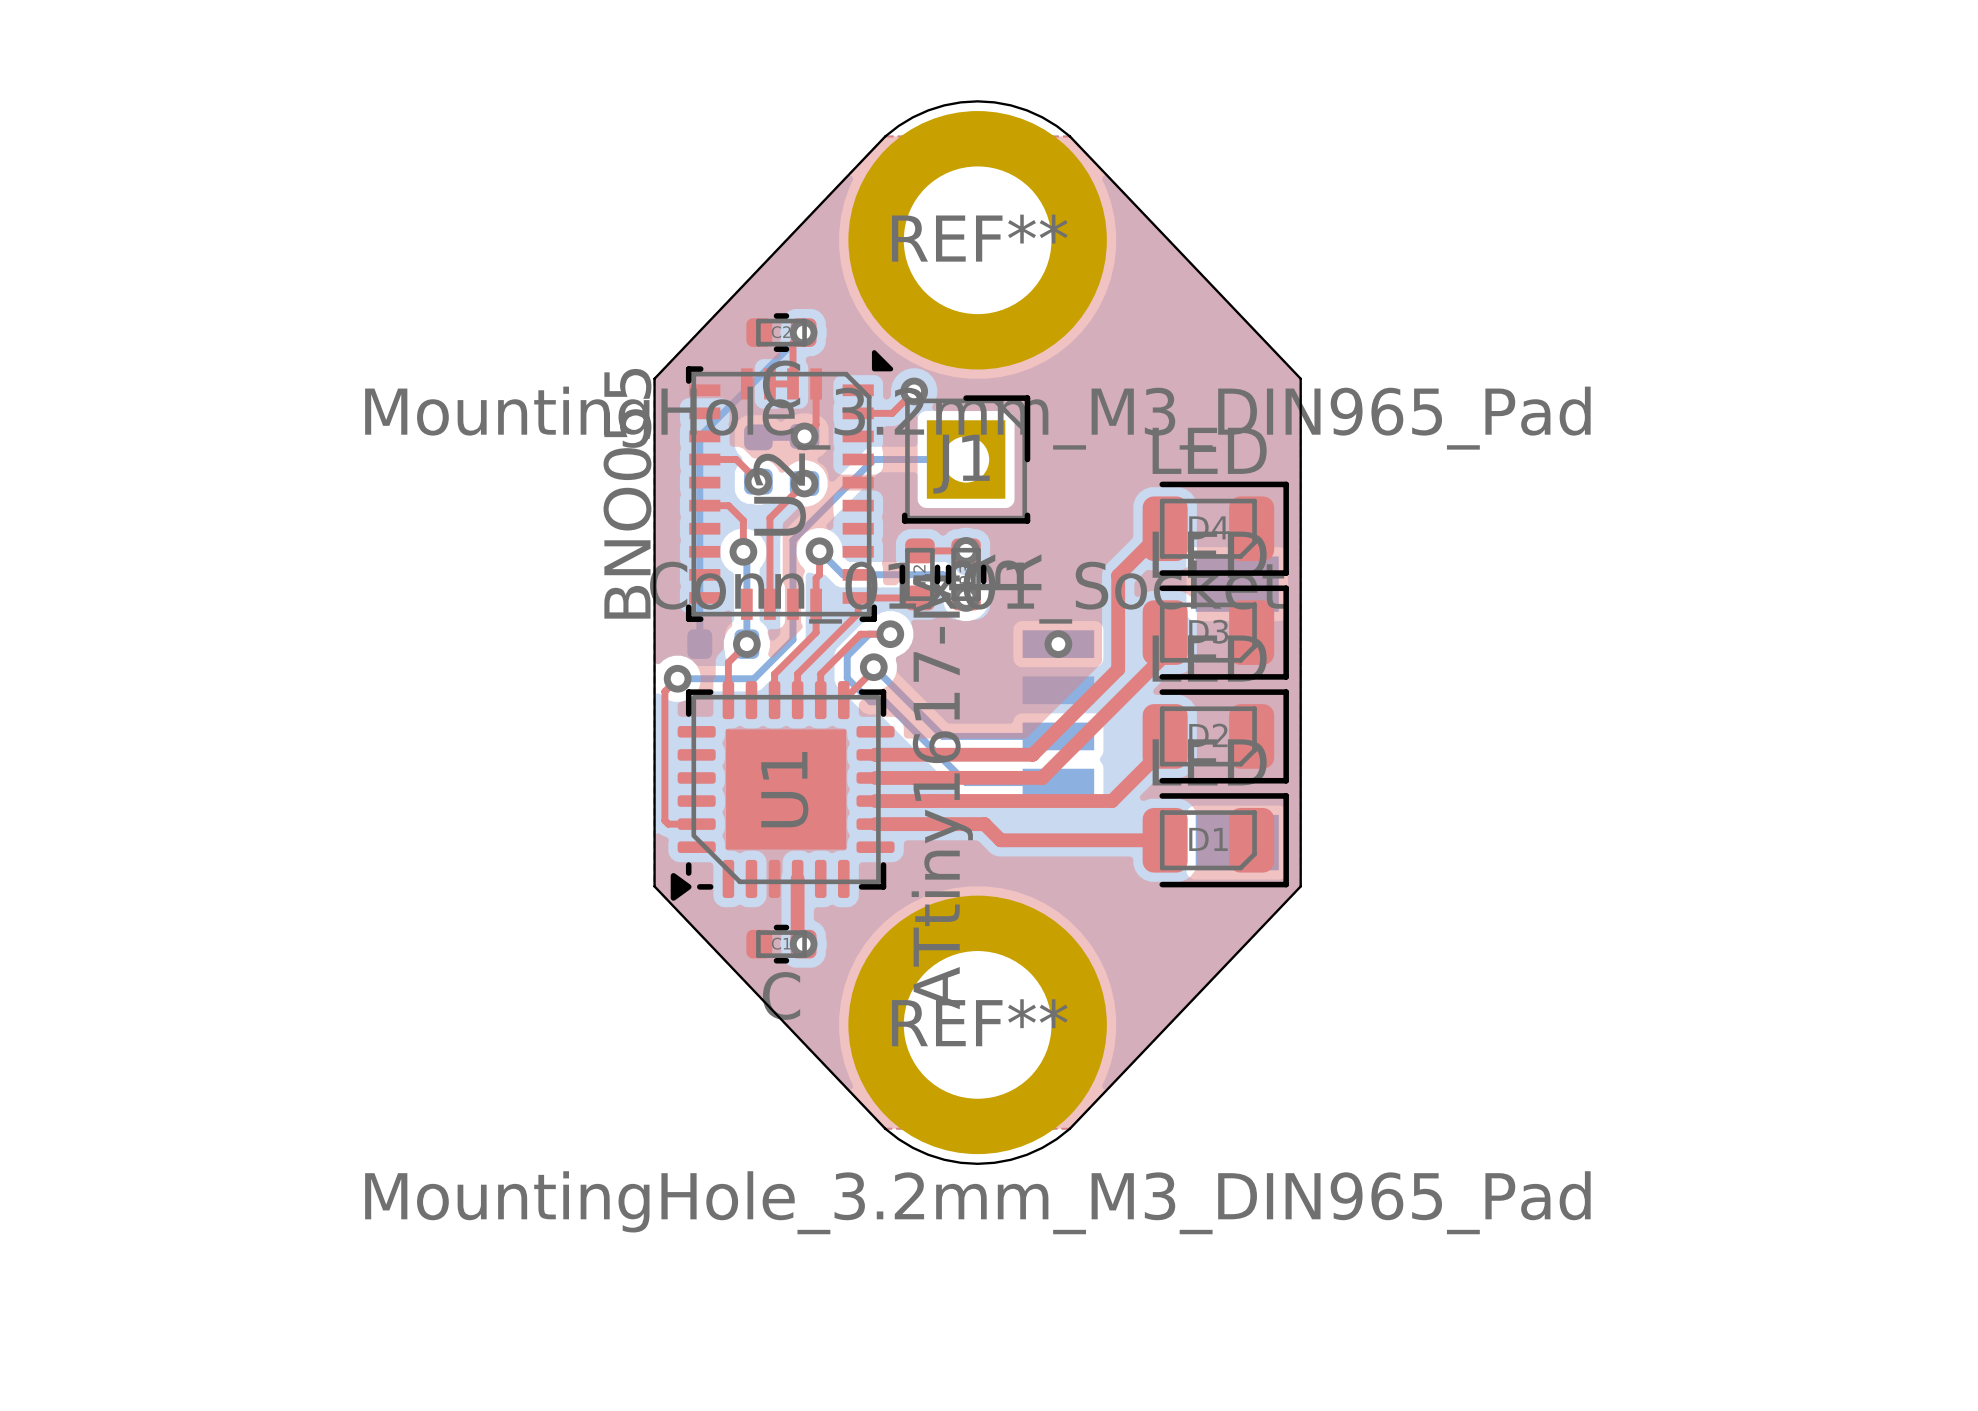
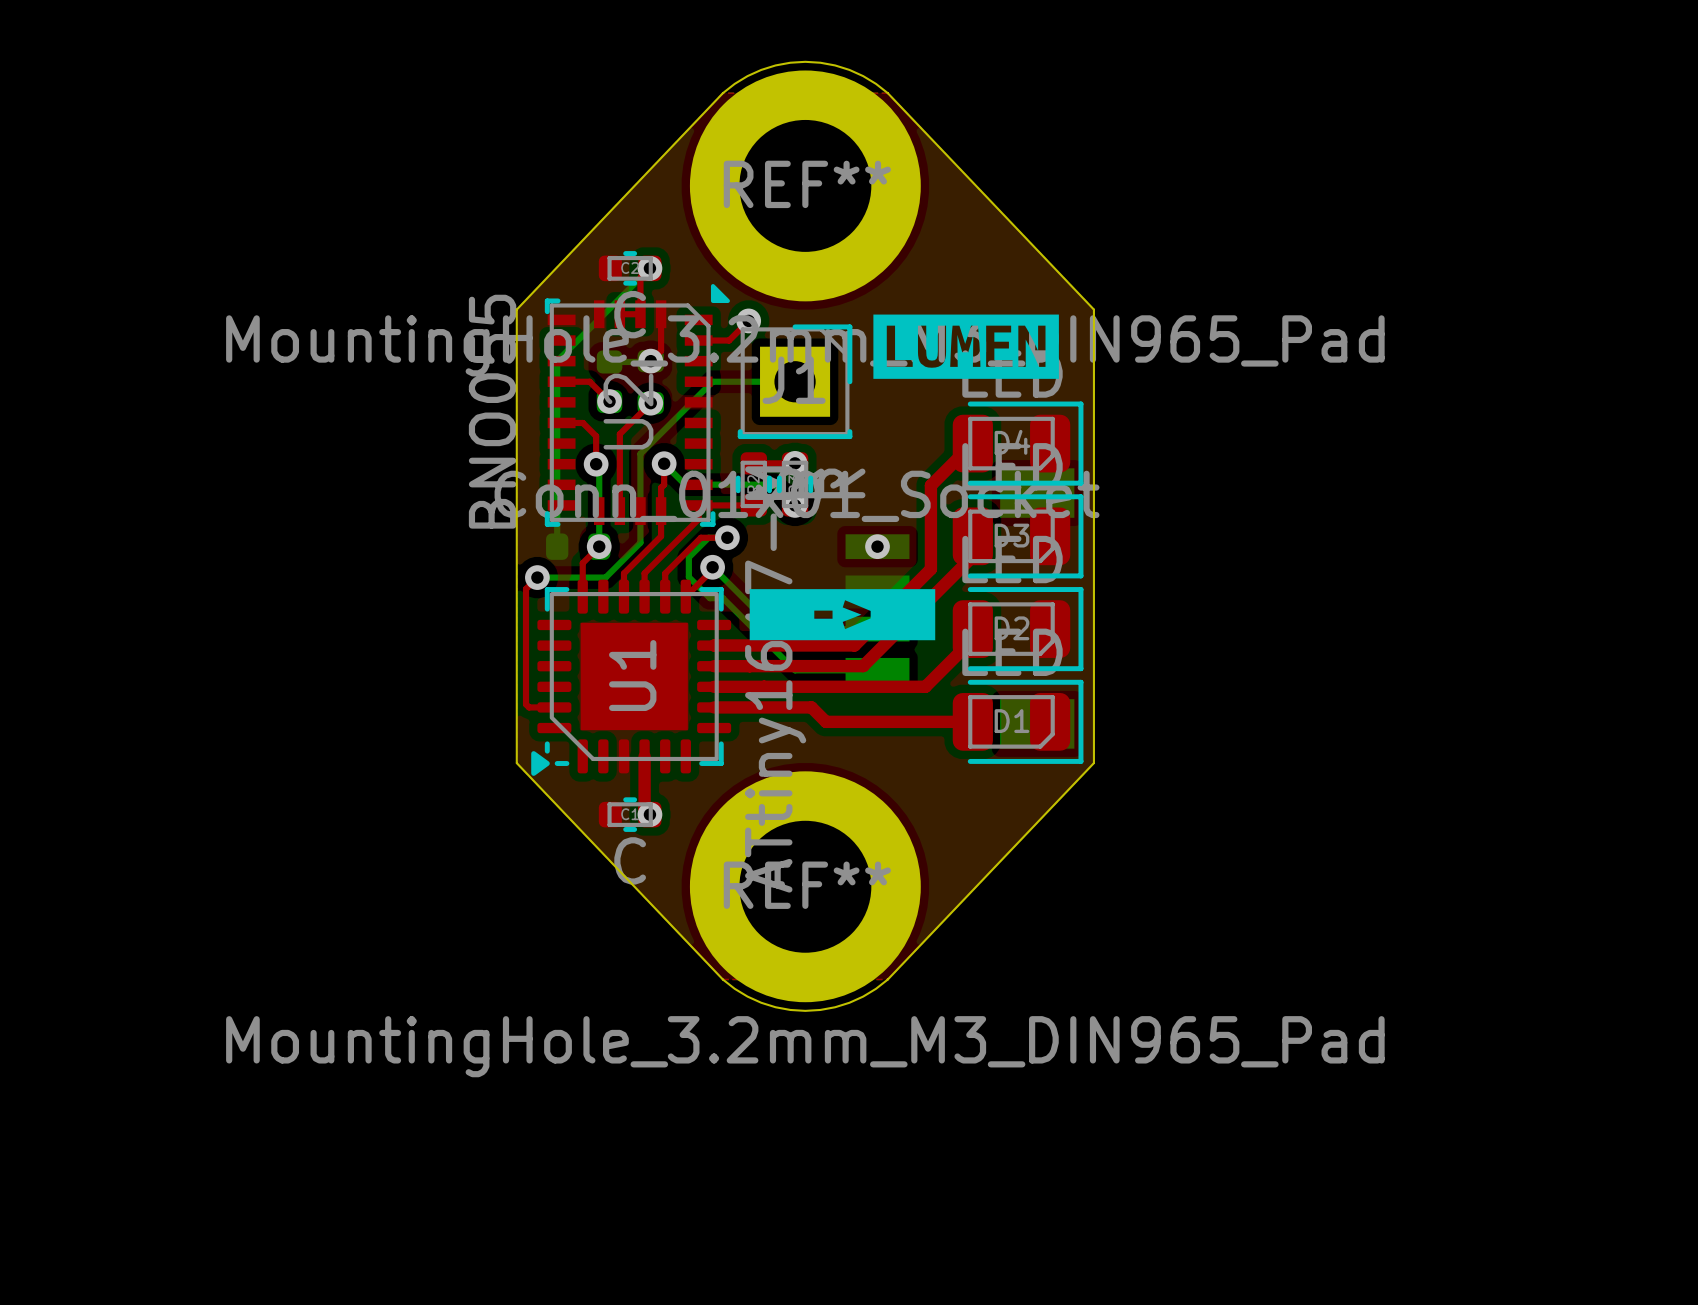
drawing: none -> [873, 314, 1059, 379]
drawing: none -> [749, 589, 936, 641]

